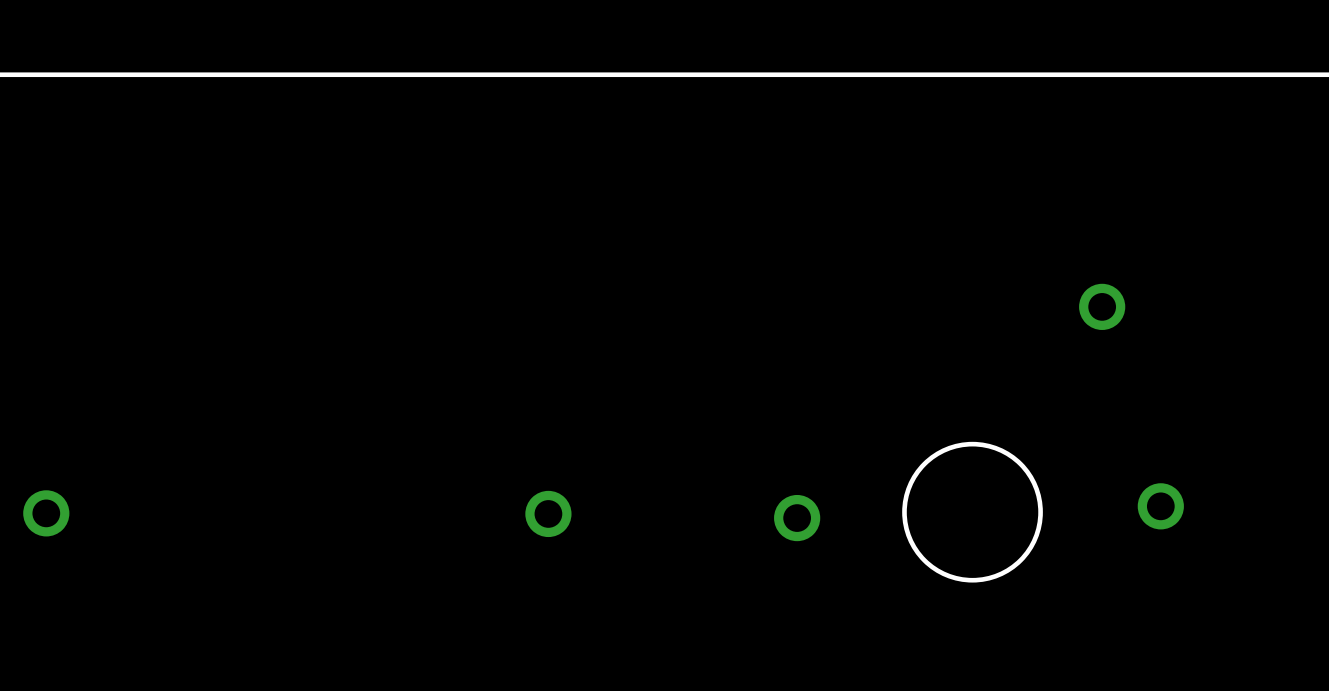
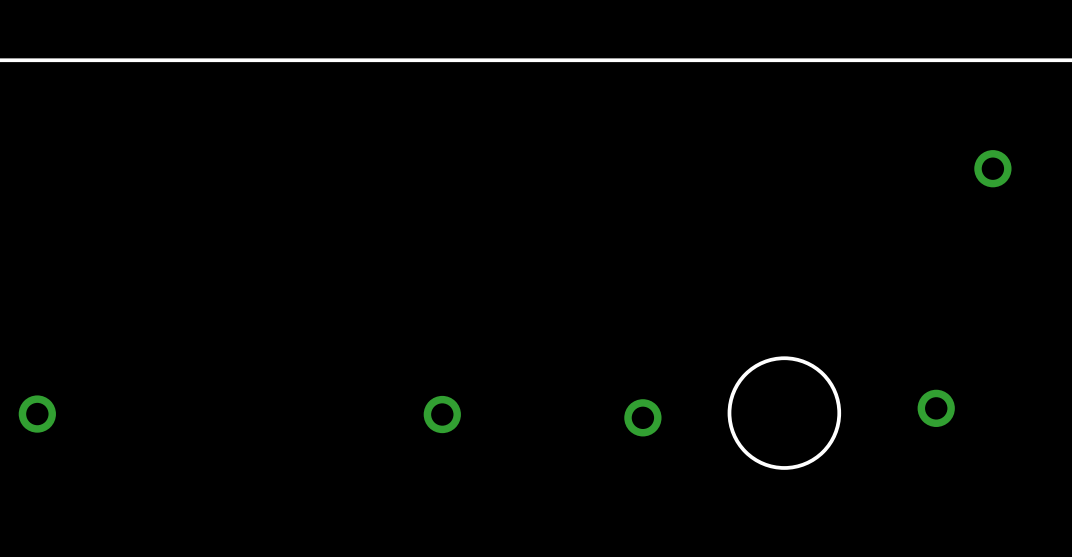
via position: (1102, 306) -> (992, 168)

